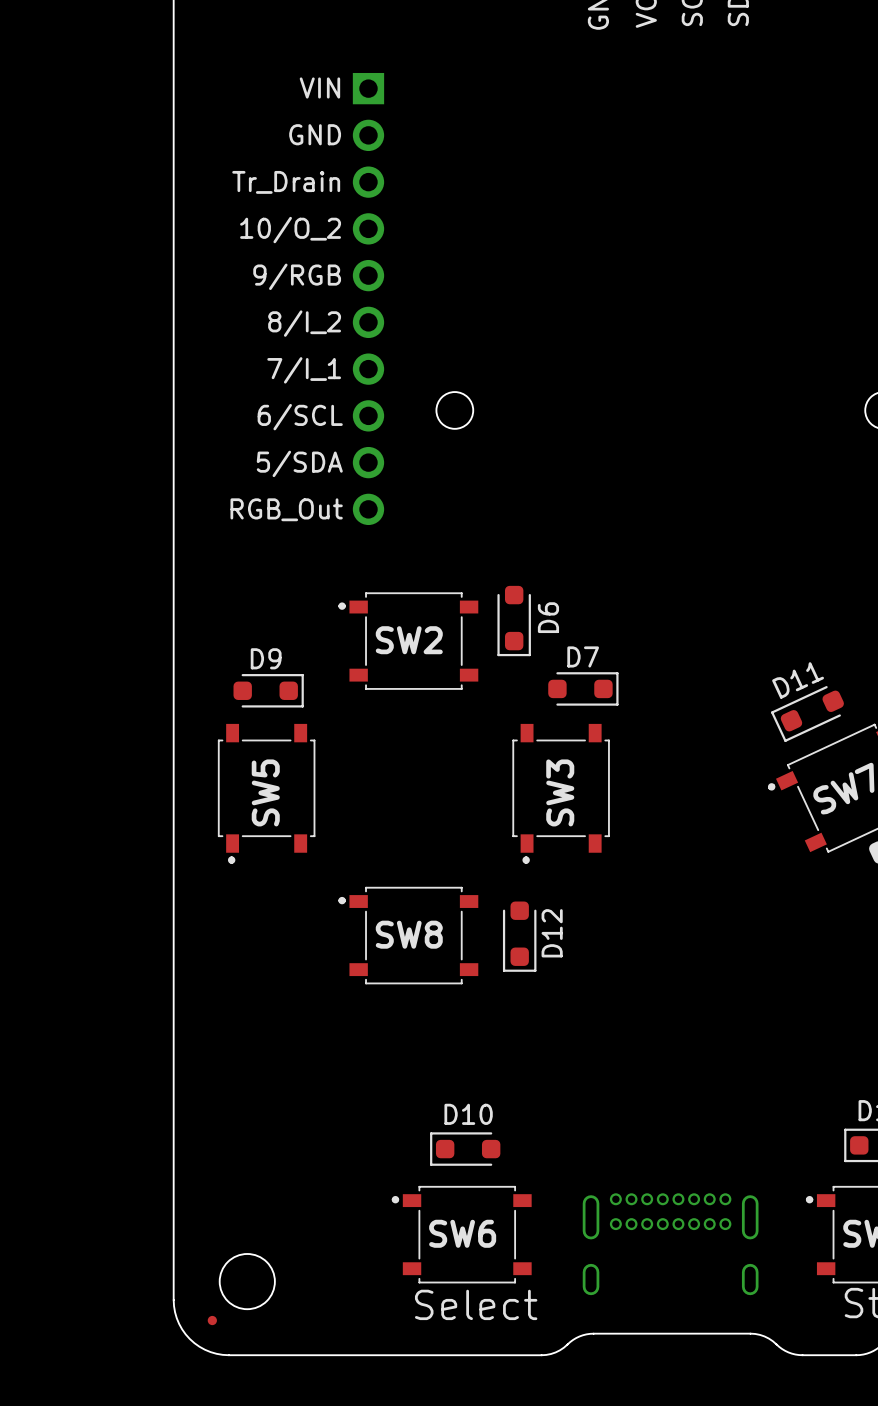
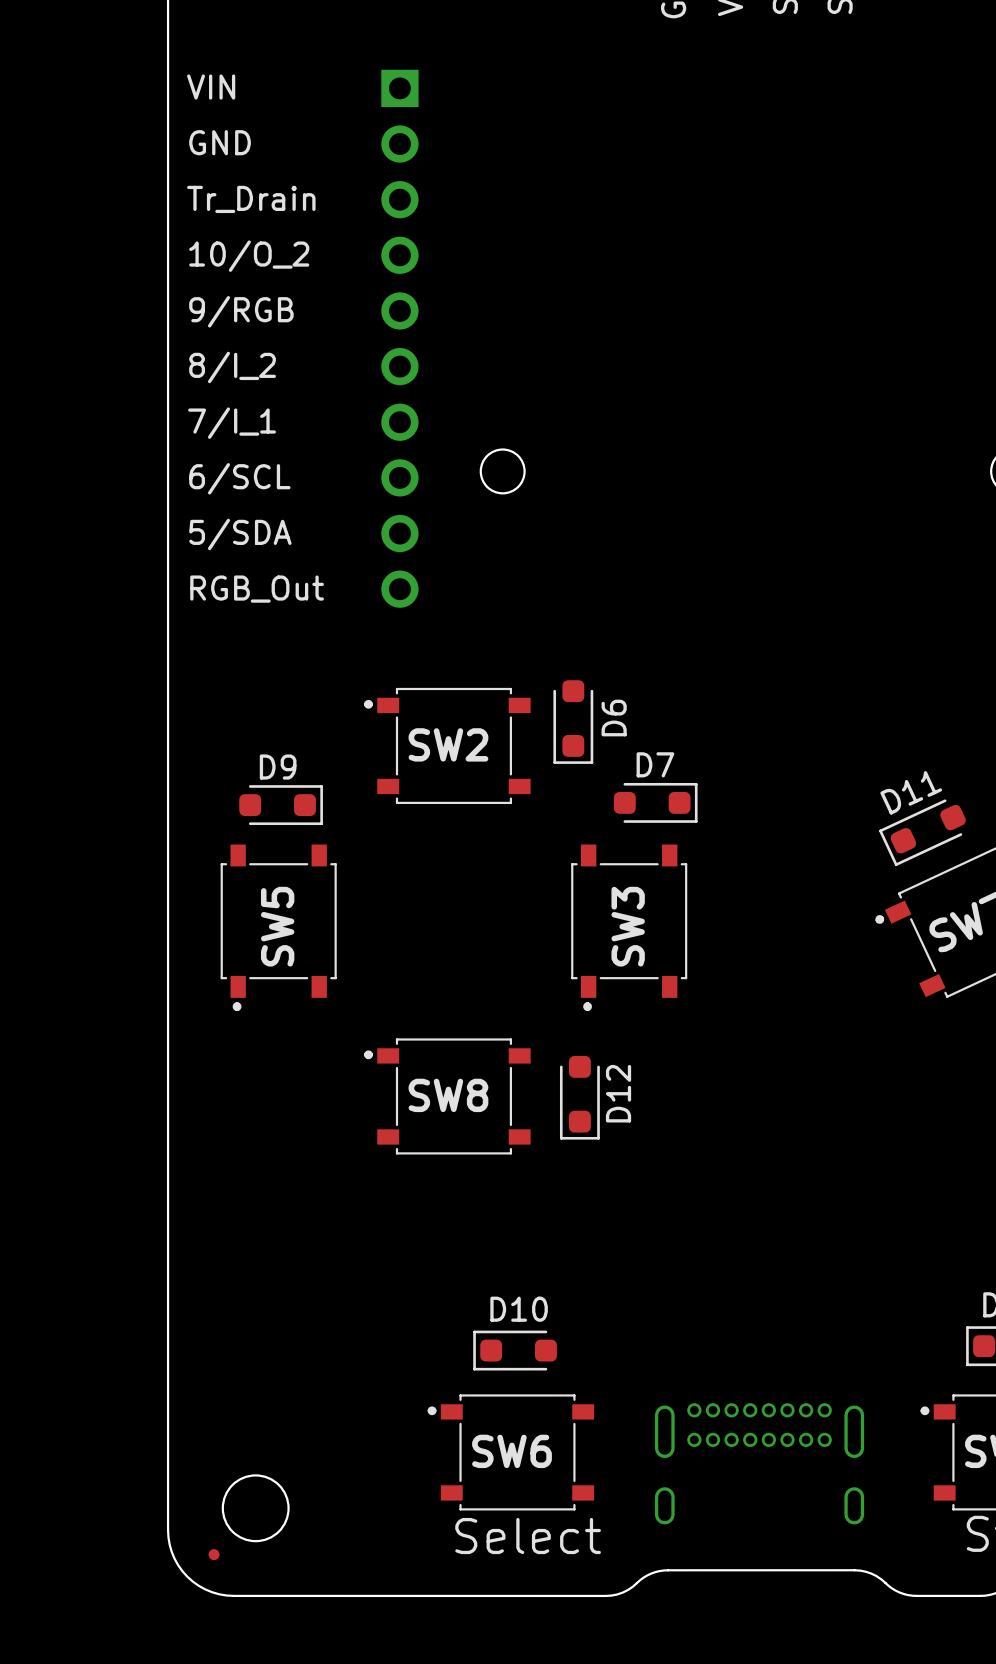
text position: VIN (319, 87) -> VIN (211, 87)
text position: GND (315, 134) -> GND (220, 142)
text position: Tr_Drain (286, 182) -> Tr_Drain (251, 199)
text position: 10/O_2 (290, 230) -> 10/O_2 (249, 256)
text position: 9/RGB (297, 276) -> 9/RGB (241, 311)
text position: 8/I_2 (304, 323) -> 8/I_2 (232, 367)
text position: 7/I_1 (304, 370) -> 7/I_1 (232, 423)
text position: 6/SCL (300, 417) -> 6/SCL (239, 478)
text position: 5/SDA (299, 463) -> 5/SDA (240, 534)
text position: RGB_Out (286, 509) -> RGB_Out (257, 589)

